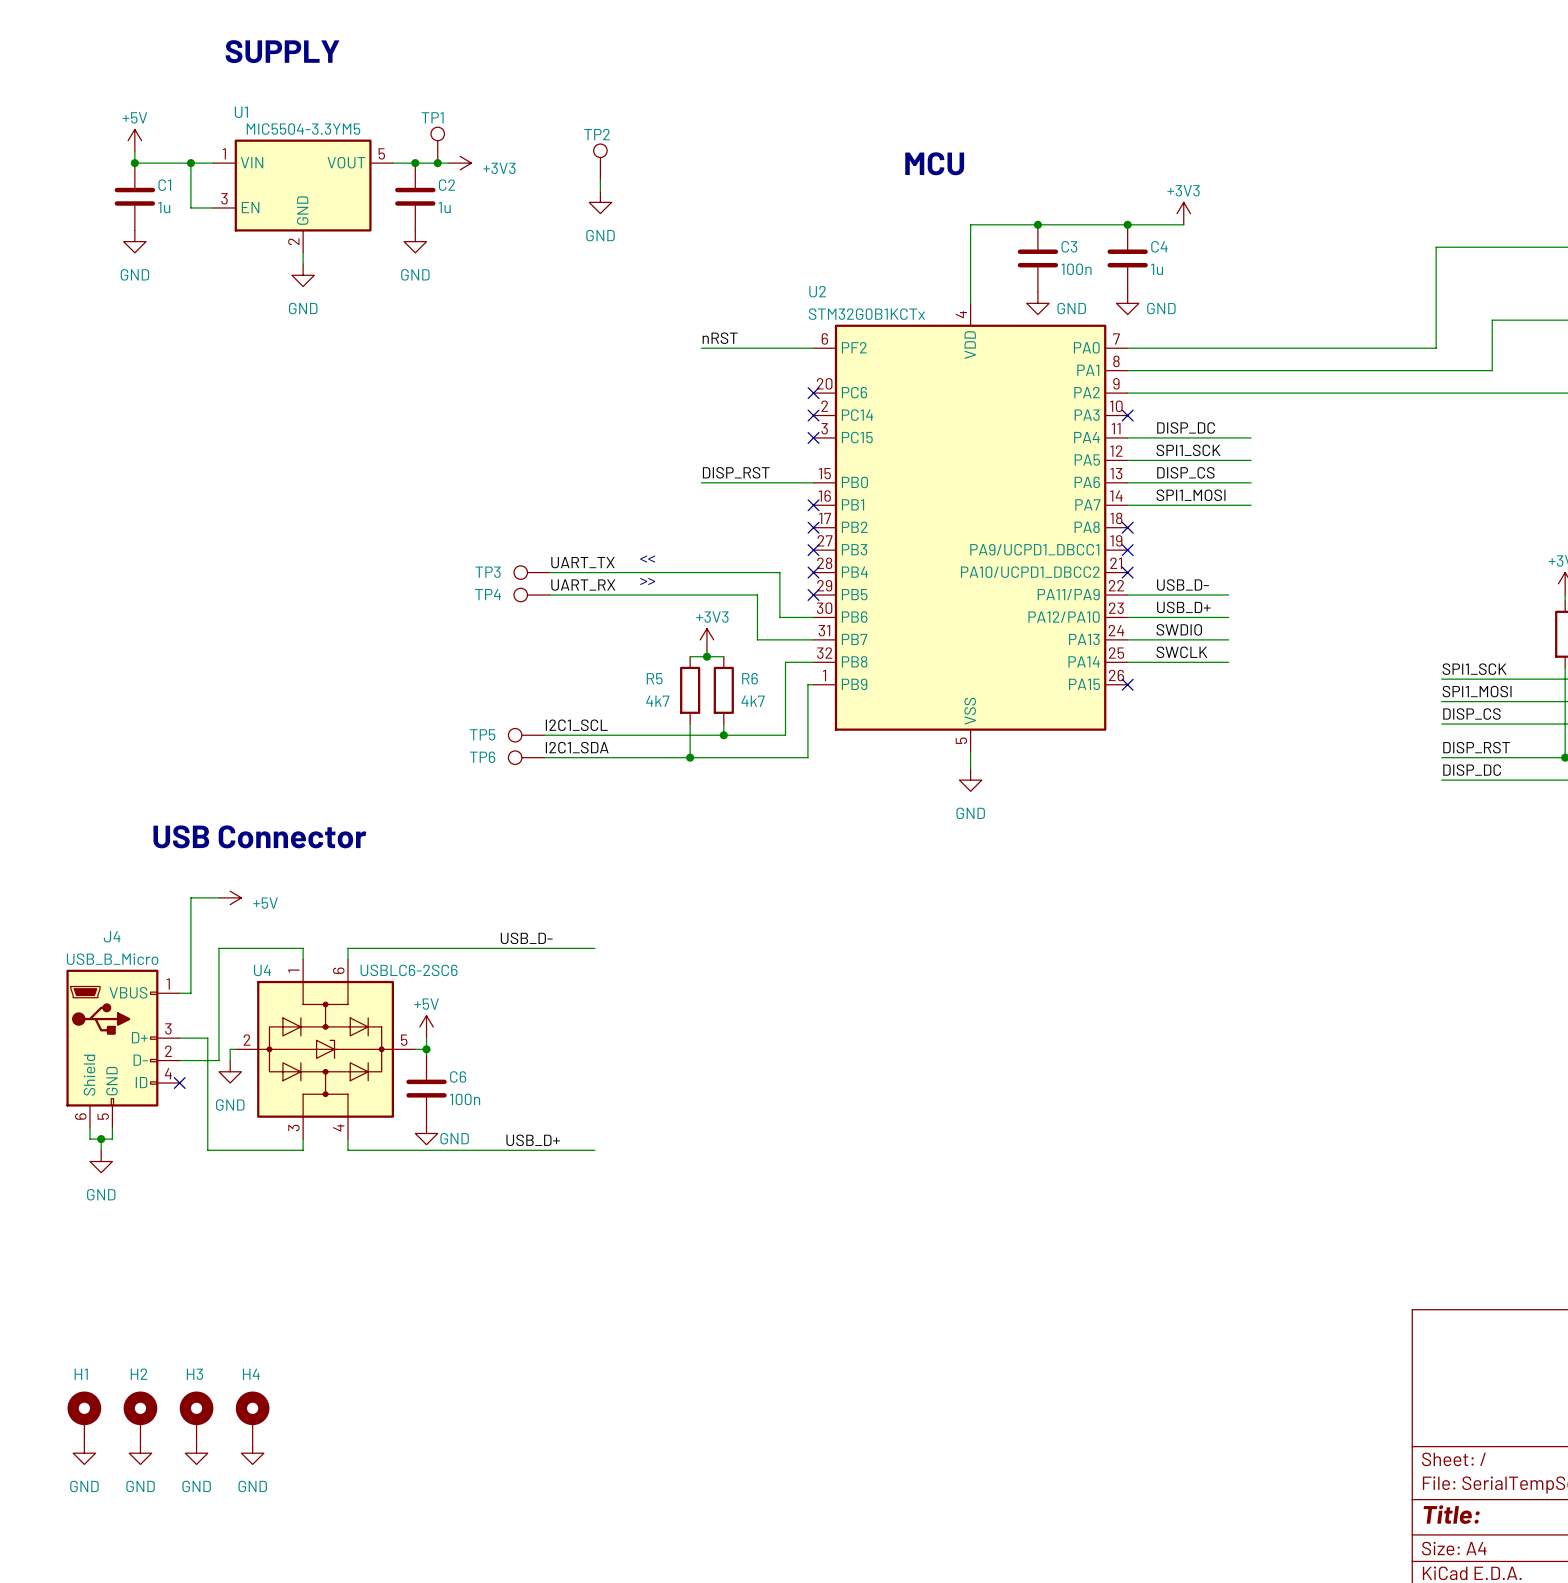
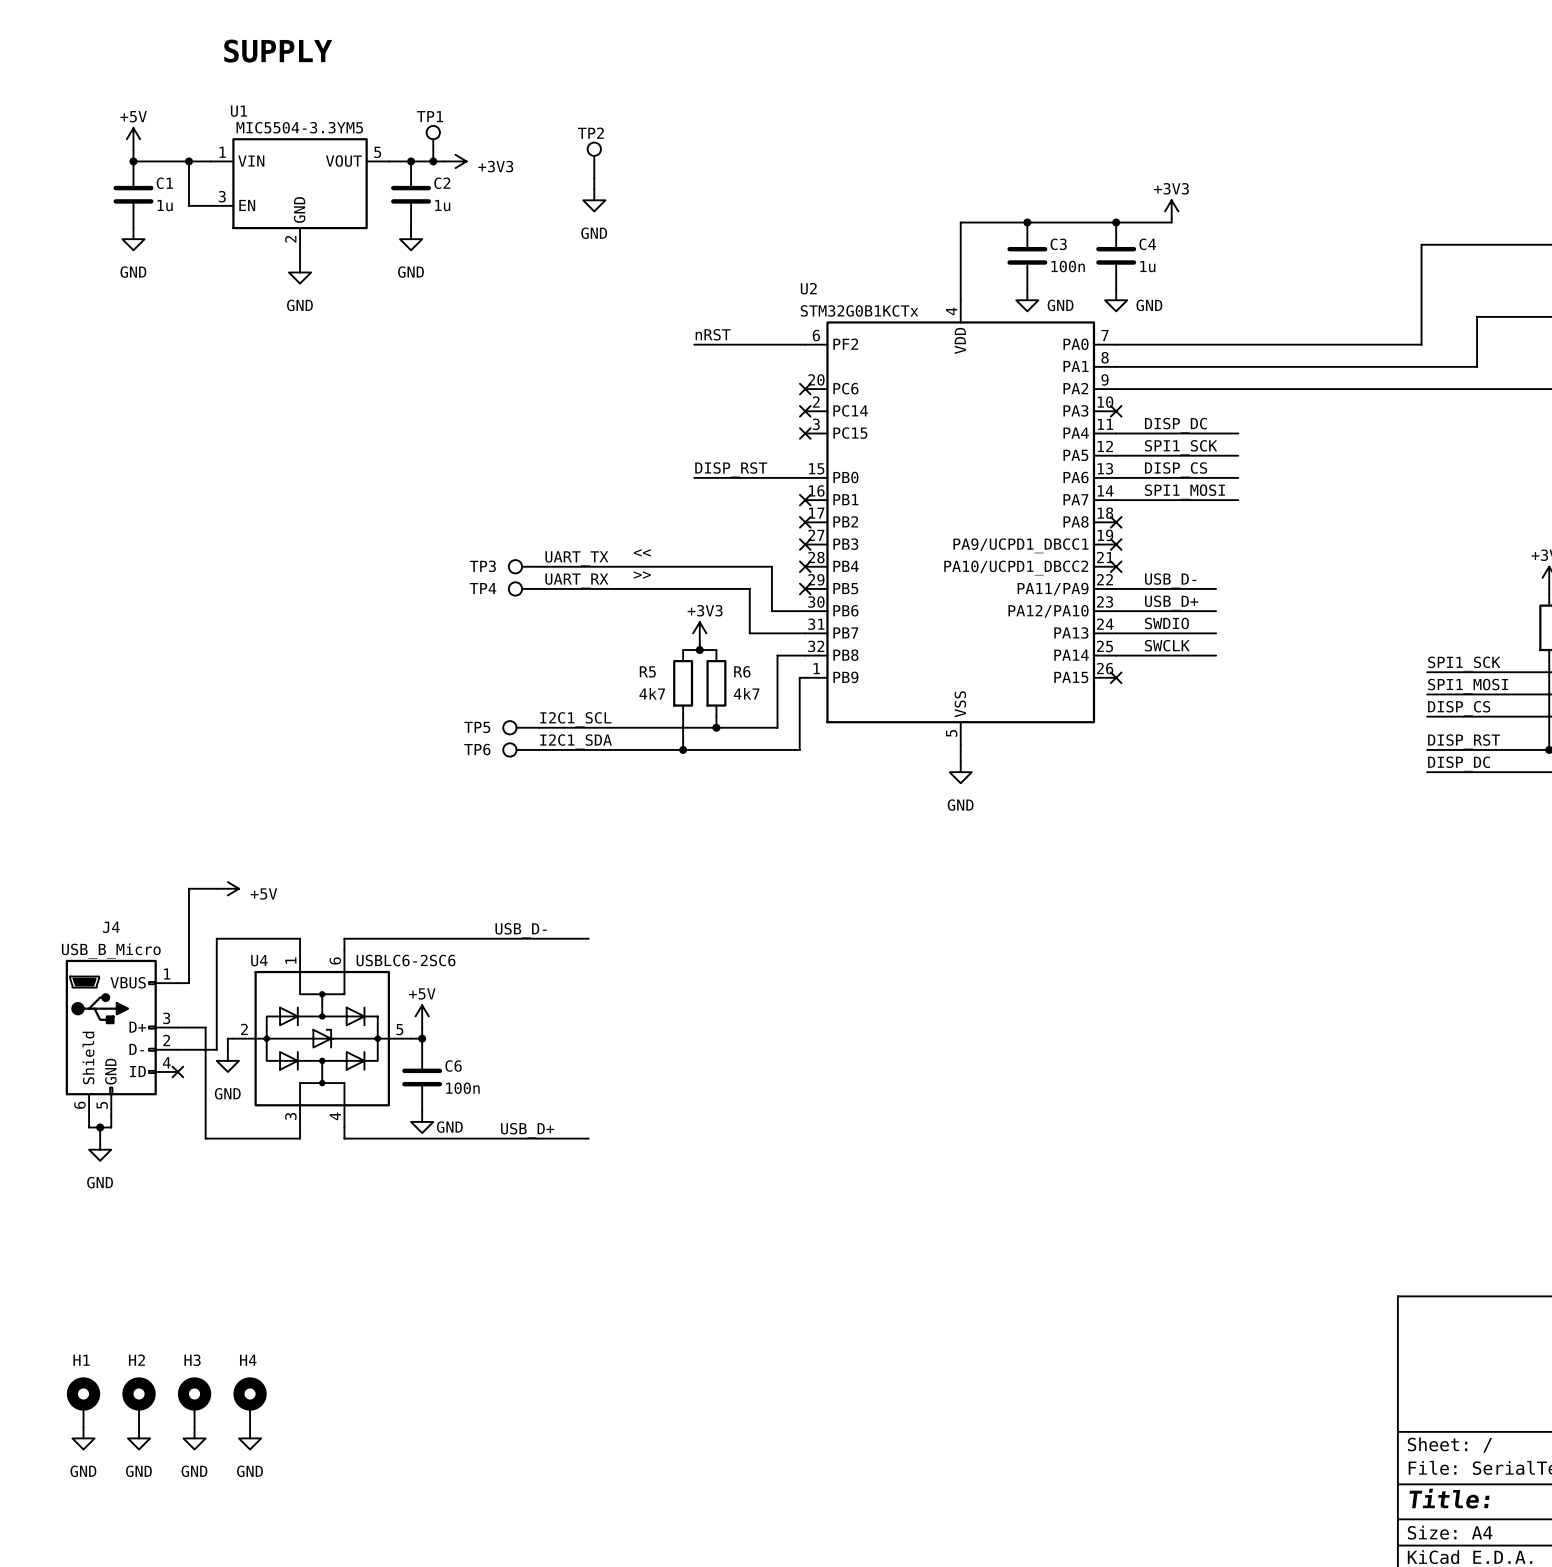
text: MCU (934, 163) -> none
text: USB Connector (259, 836) -> none

